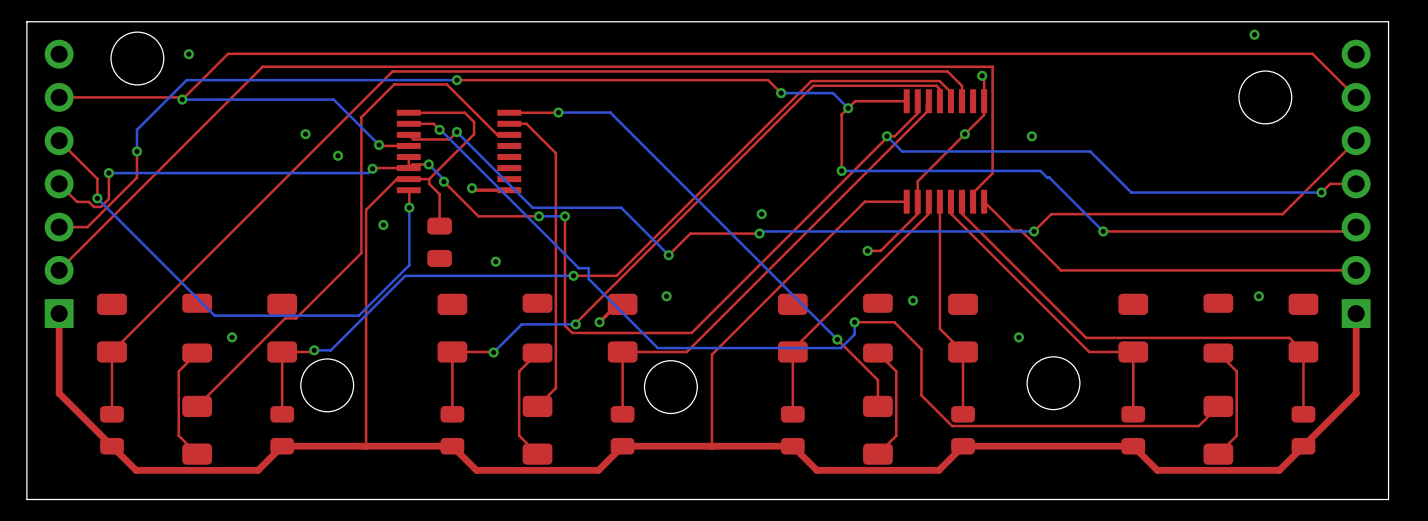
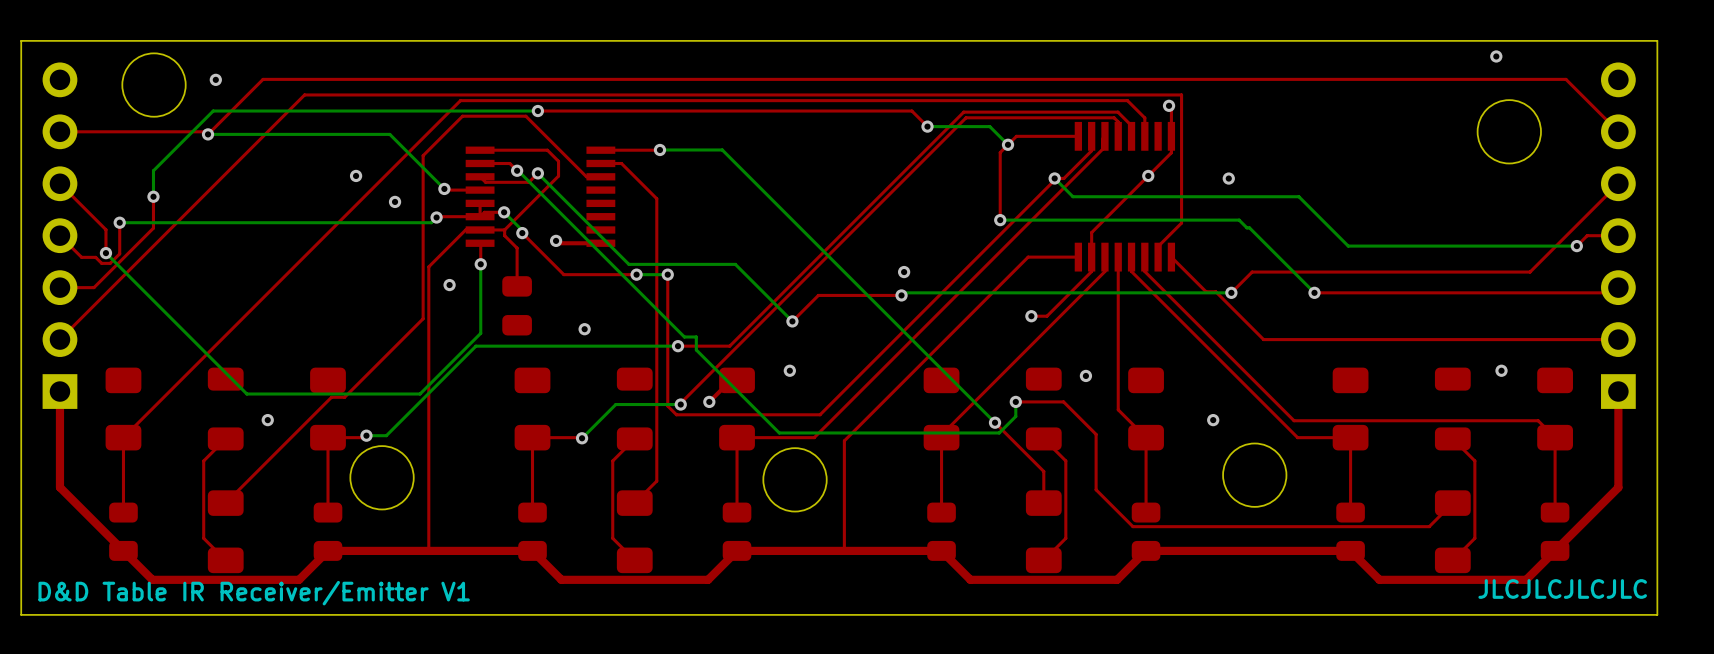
text: none -> JLCJLCJLCJLC (1562, 588)
text: none -> D&D Table IR Receiver/Emitter V1 (254, 593)

